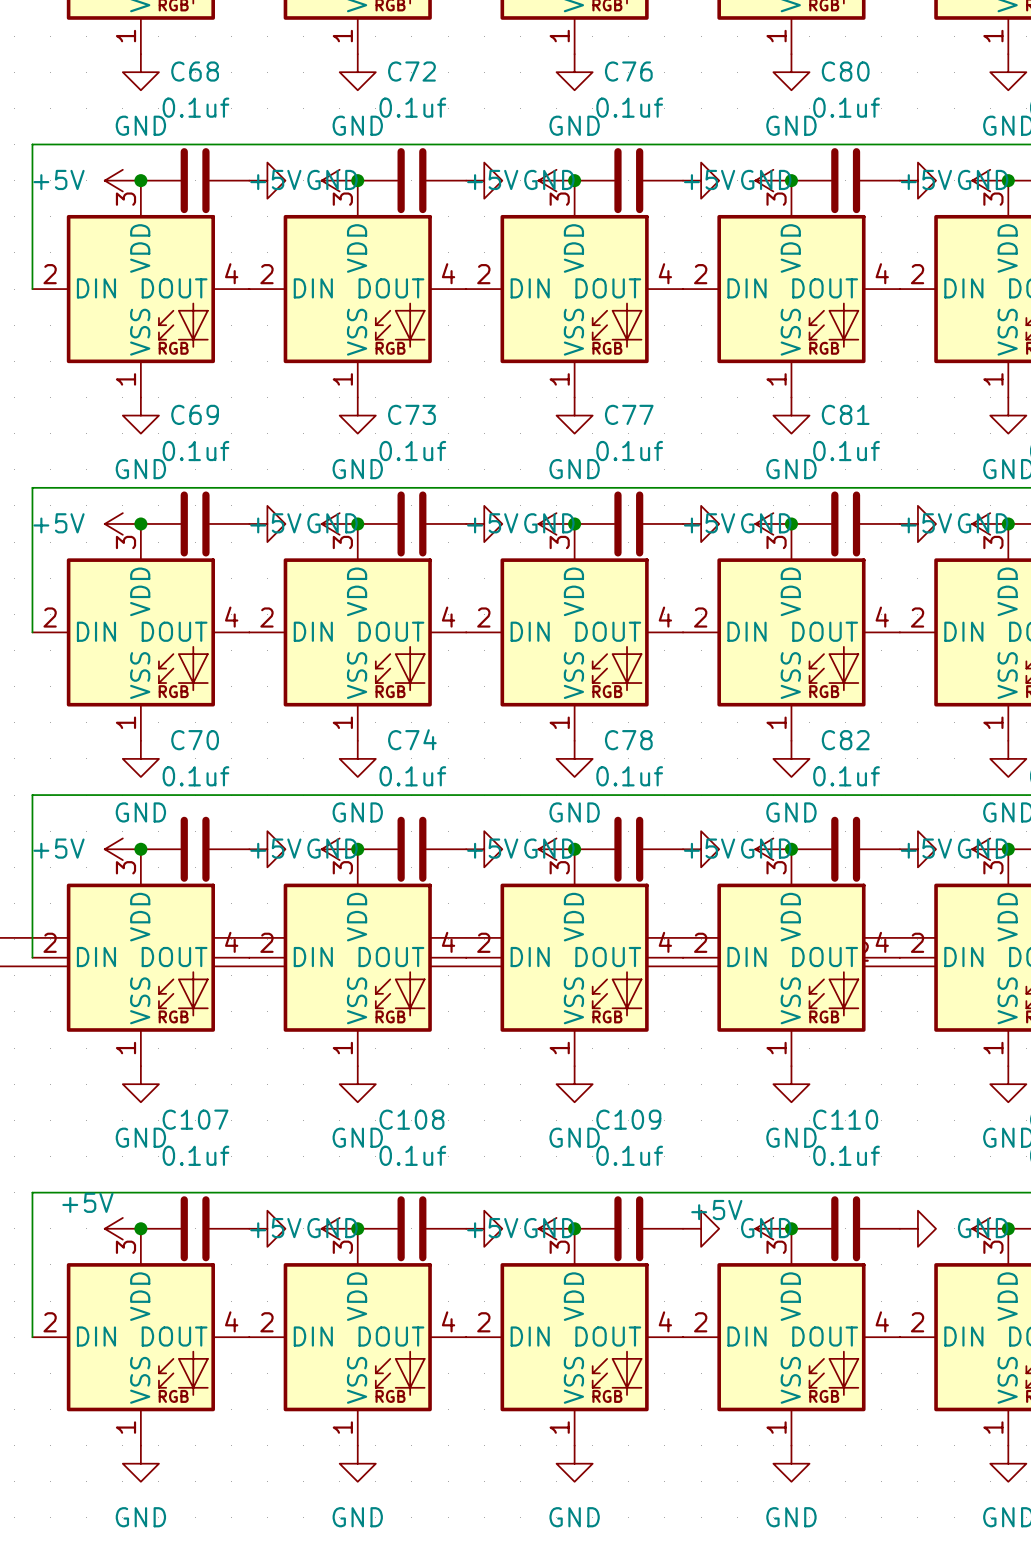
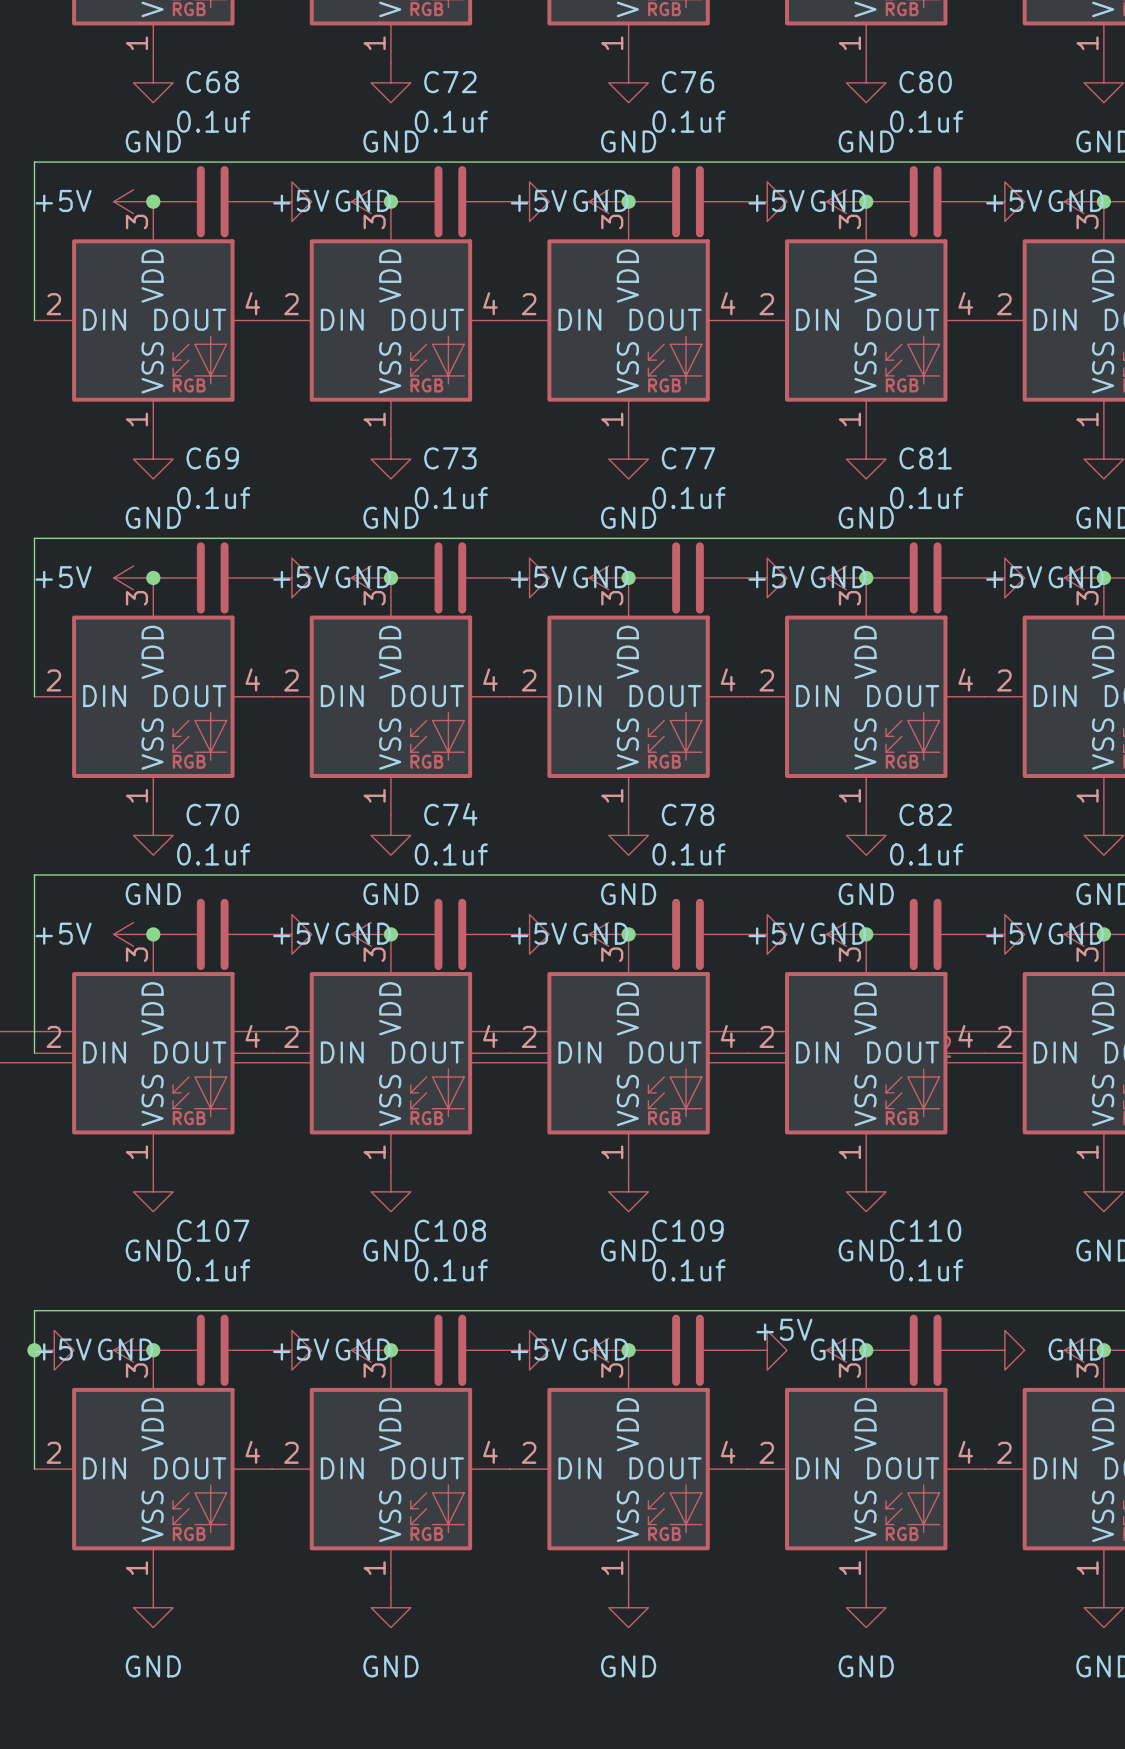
power symbol text position: +5V (87, 1202) -> +5V (63, 1349)
junction: none -> (34, 1350)
power symbol: none -> GND (54, 1350)

